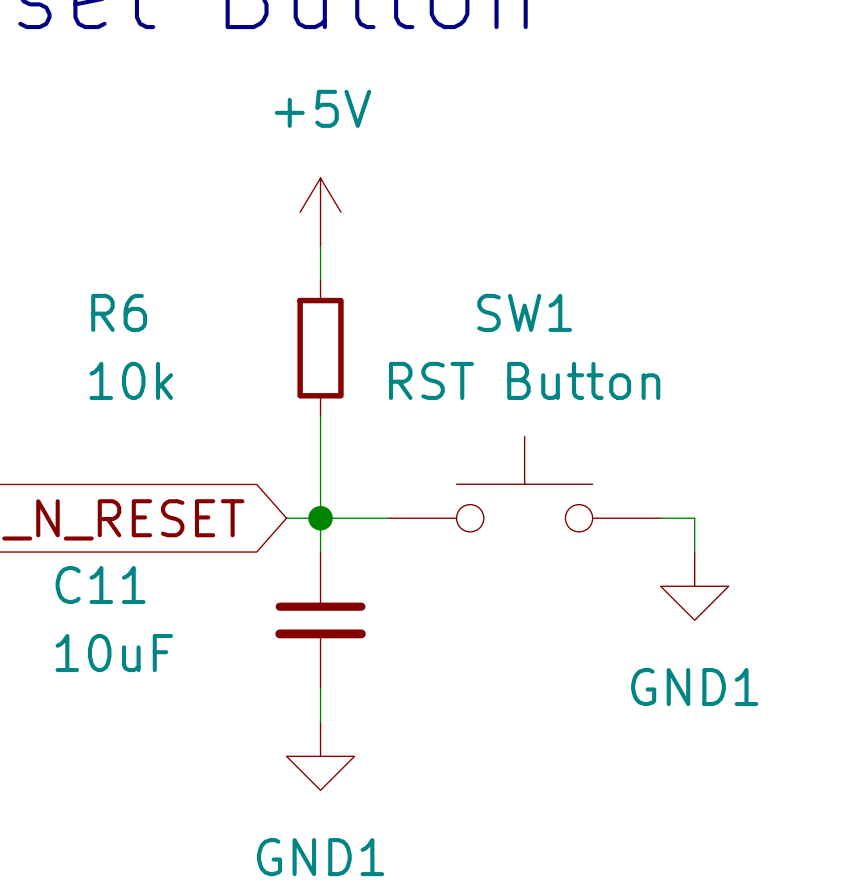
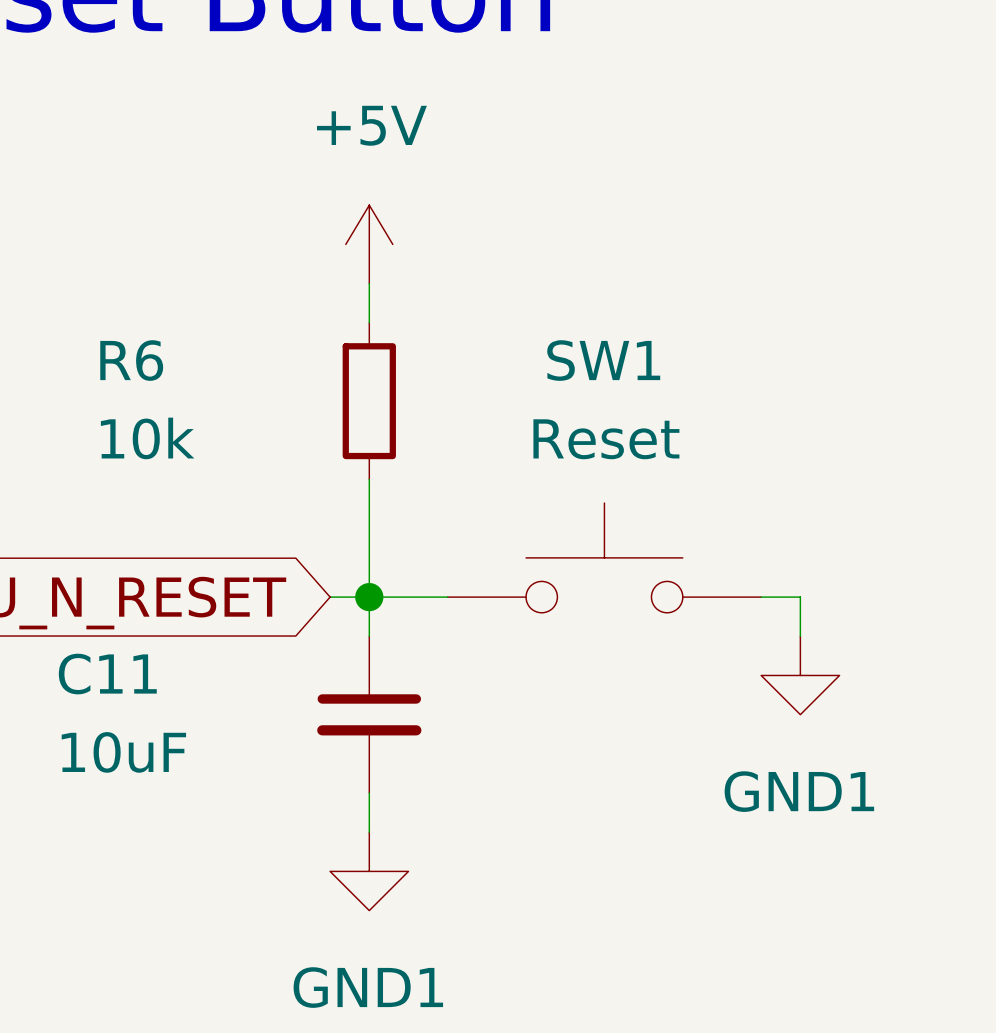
SW1 value: RST Button (524, 380) -> Reset (606, 439)

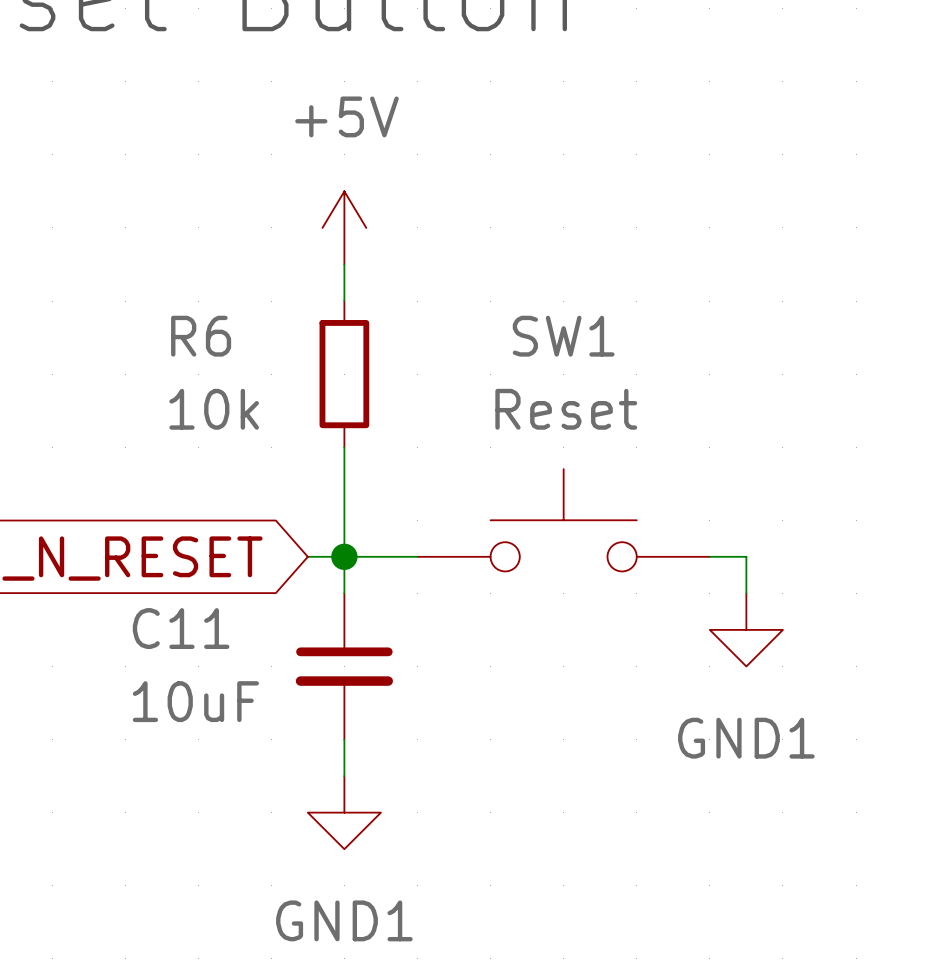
R6 name position: R6 (131, 360) -> R6 (201, 336)
R6 value position: 10k (147, 438) -> 10k (214, 409)
C11 name position: C11 (107, 674) -> C11 (181, 628)
C11 value position: 10uF (123, 752) -> 10uF (195, 701)

